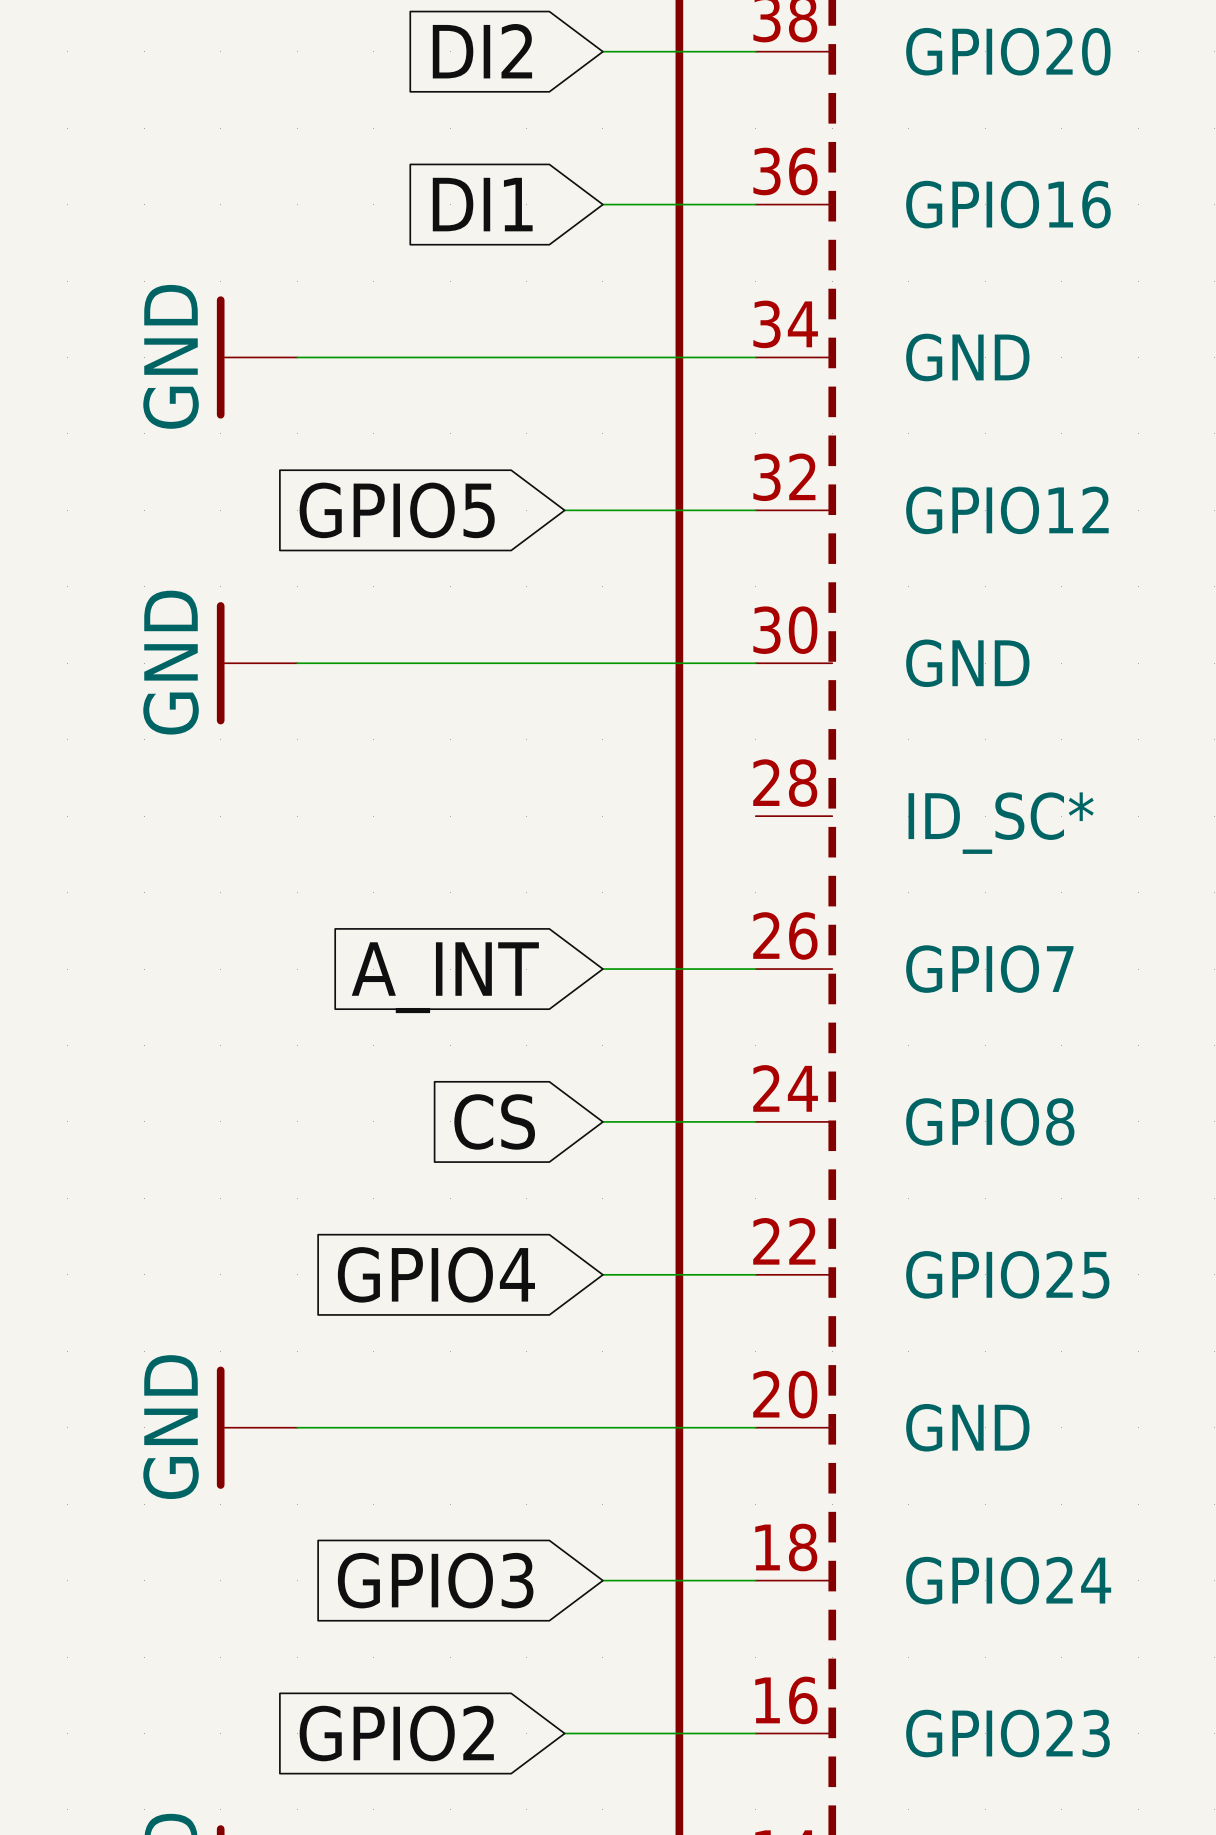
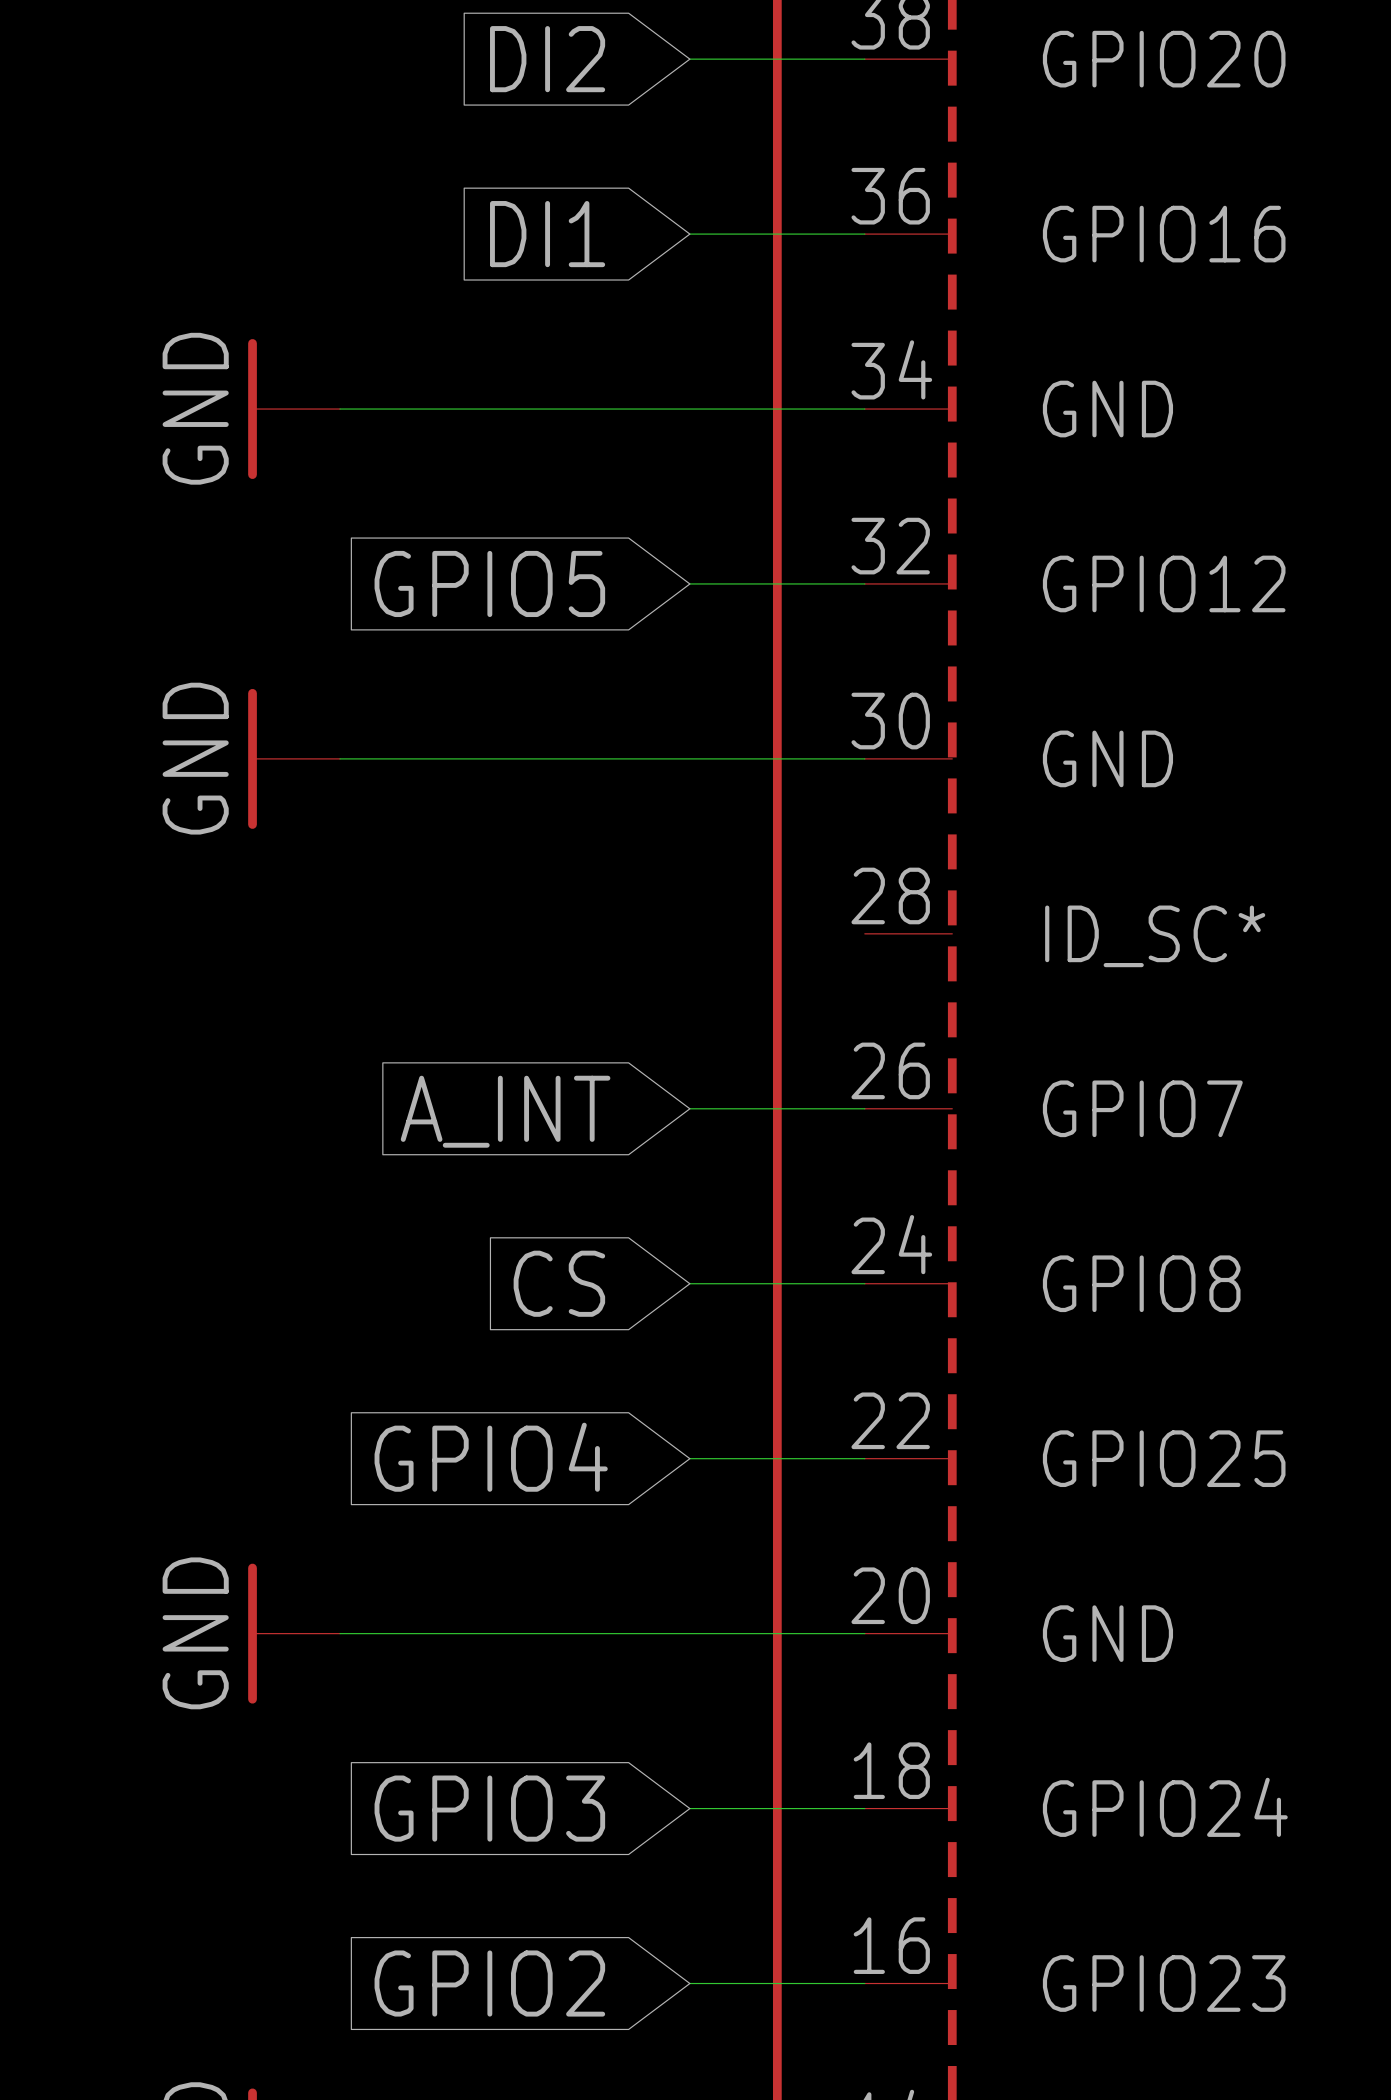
global label position: GPIO5 (397, 510) -> GPIO5 (489, 583)
wire: (564, 510) (602, 510) -> none
global label position: GPIO2 (396, 1733) -> GPIO2 (489, 1983)
wire: (564, 1733) (602, 1733) -> none

